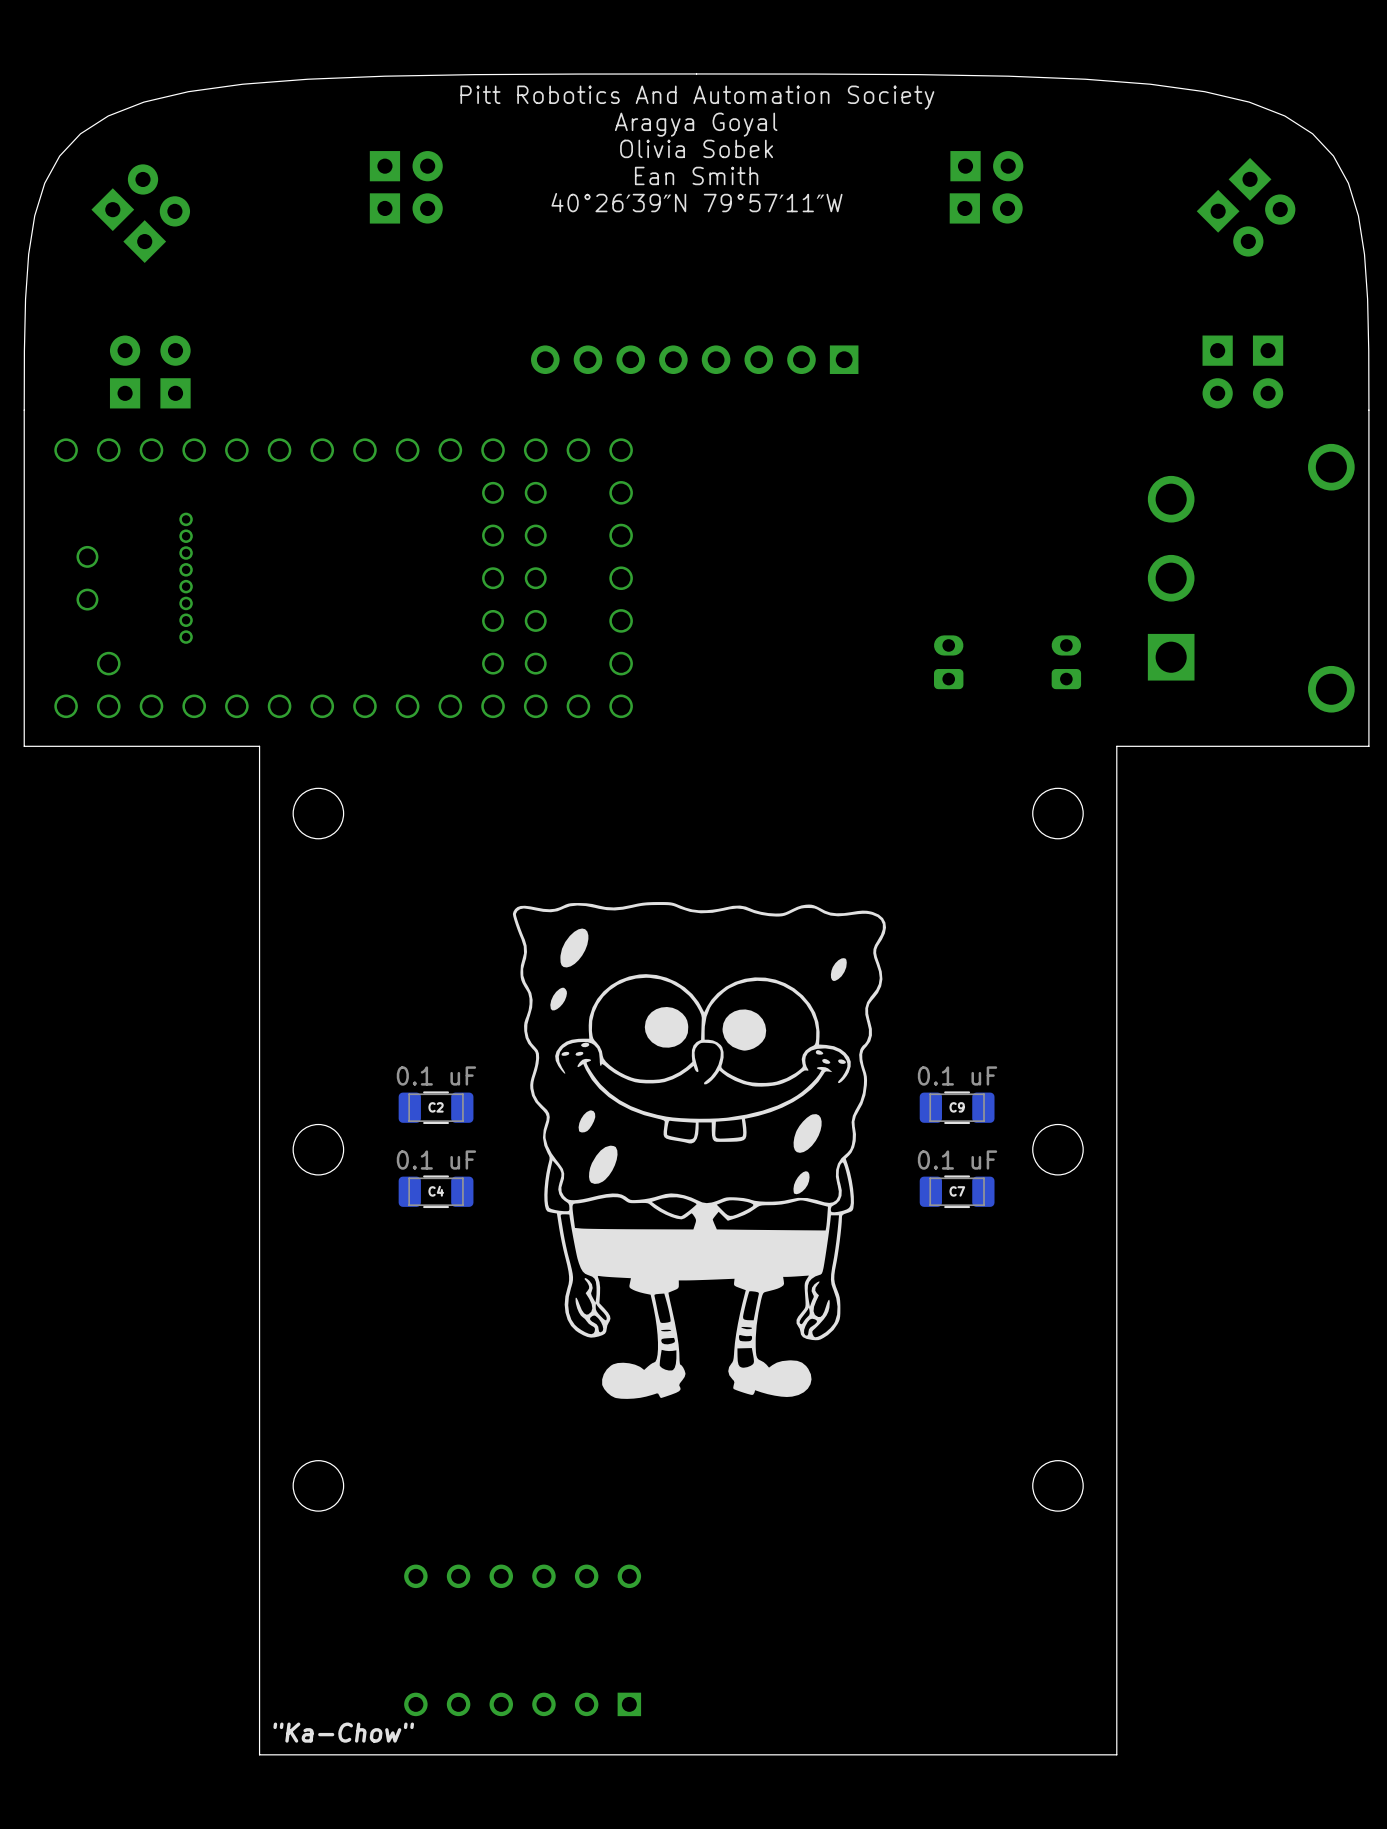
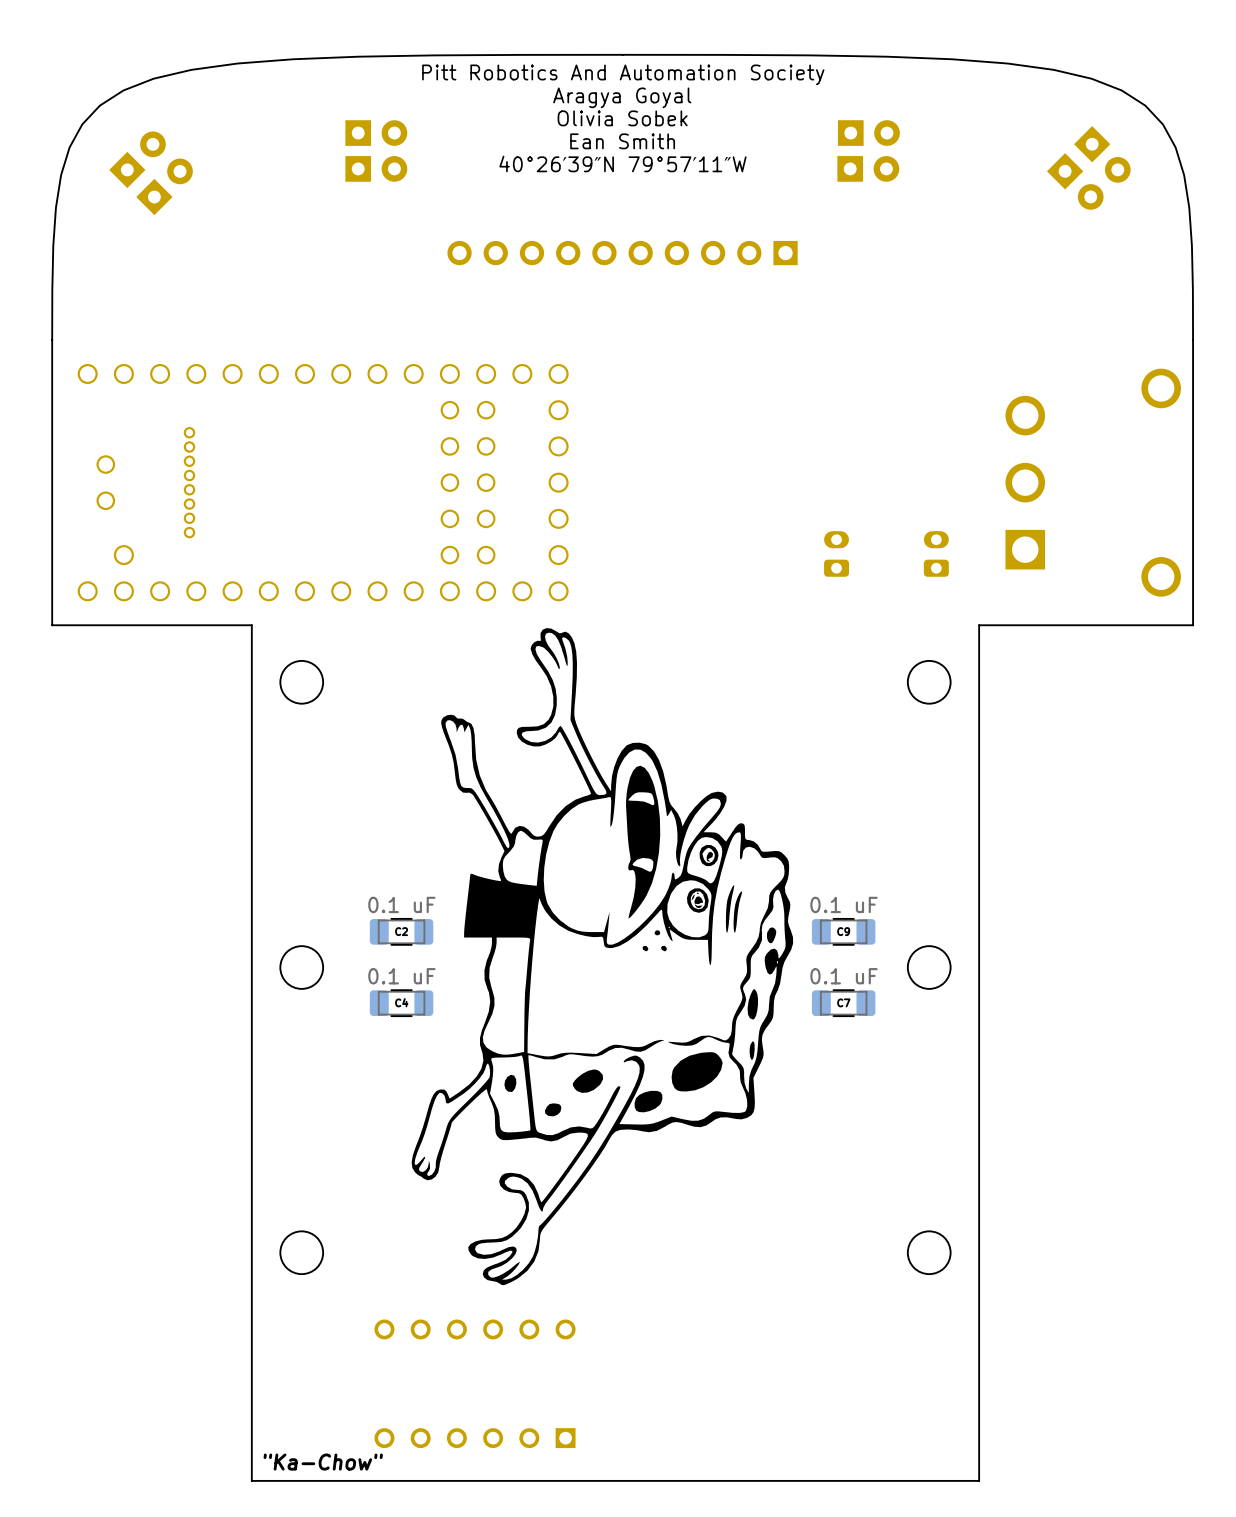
part: none -> (622, 253)
part: (694, 359) -> none
part: (125, 371) -> none
part: (175, 371) -> none
part: (1217, 371) -> none
part: (1268, 371) -> none
drawing: none -> [411, 628, 794, 1286]
drawing: [512, 902, 887, 1399] -> none

